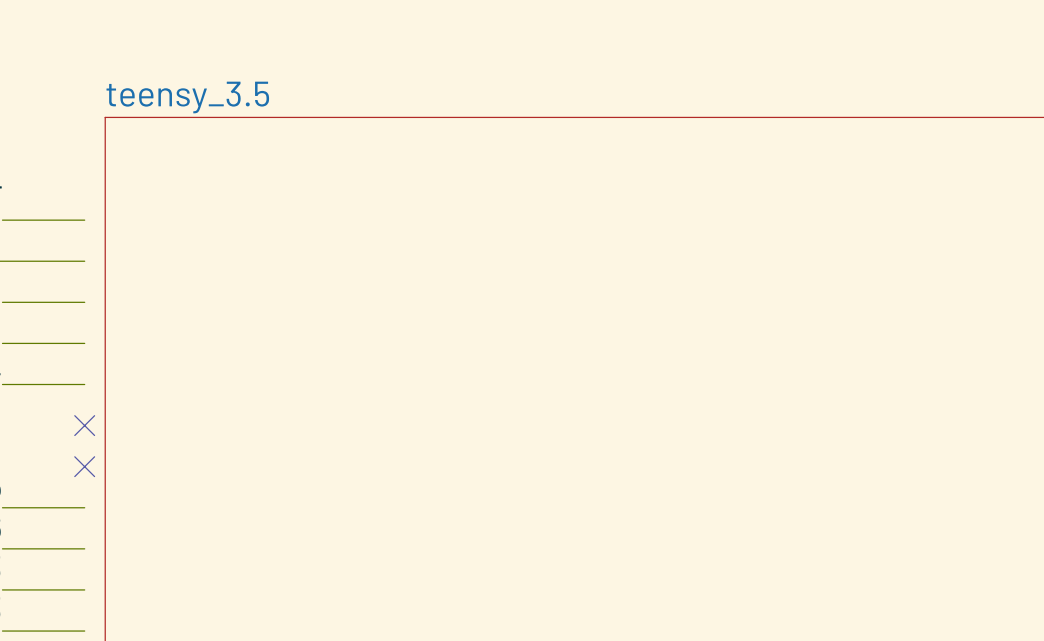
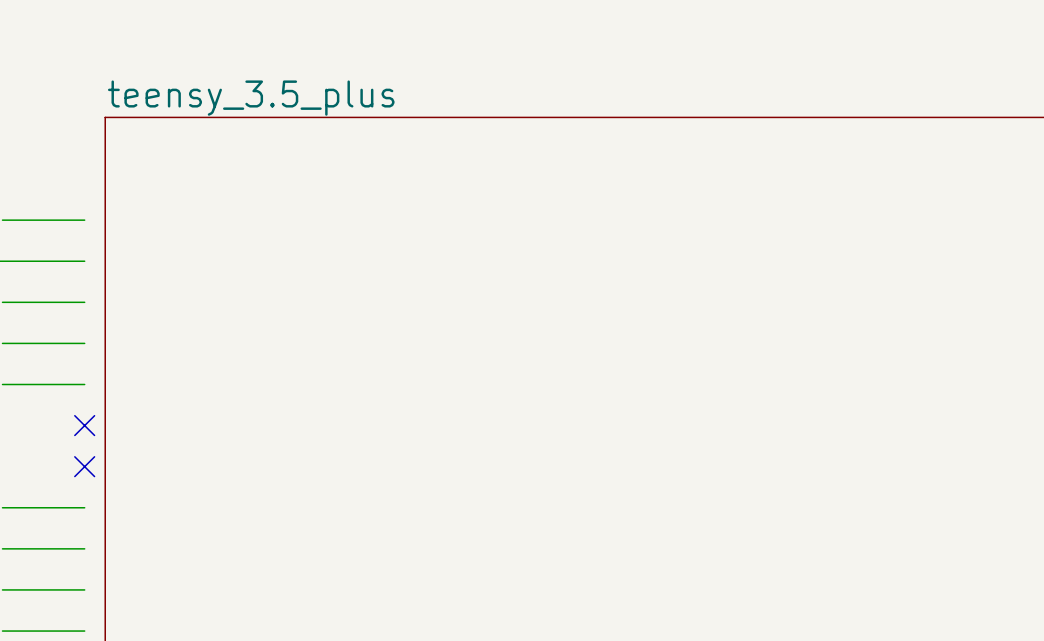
sheet teensy_3.5 name: teensy_3.5 (187, 97) -> teensy_3.5_plus (251, 98)

